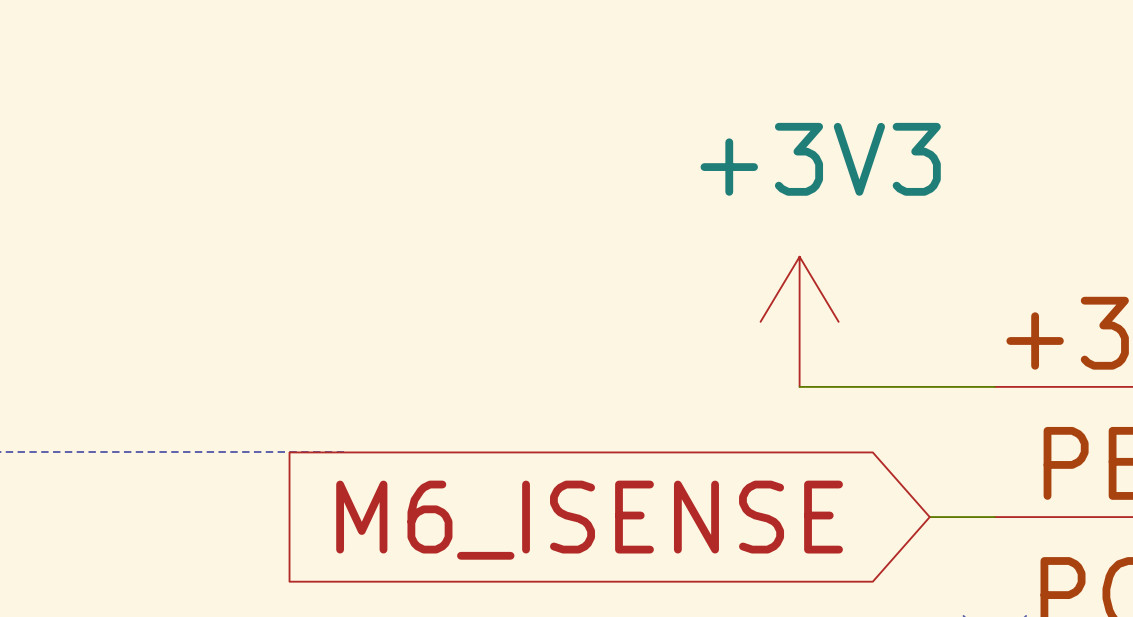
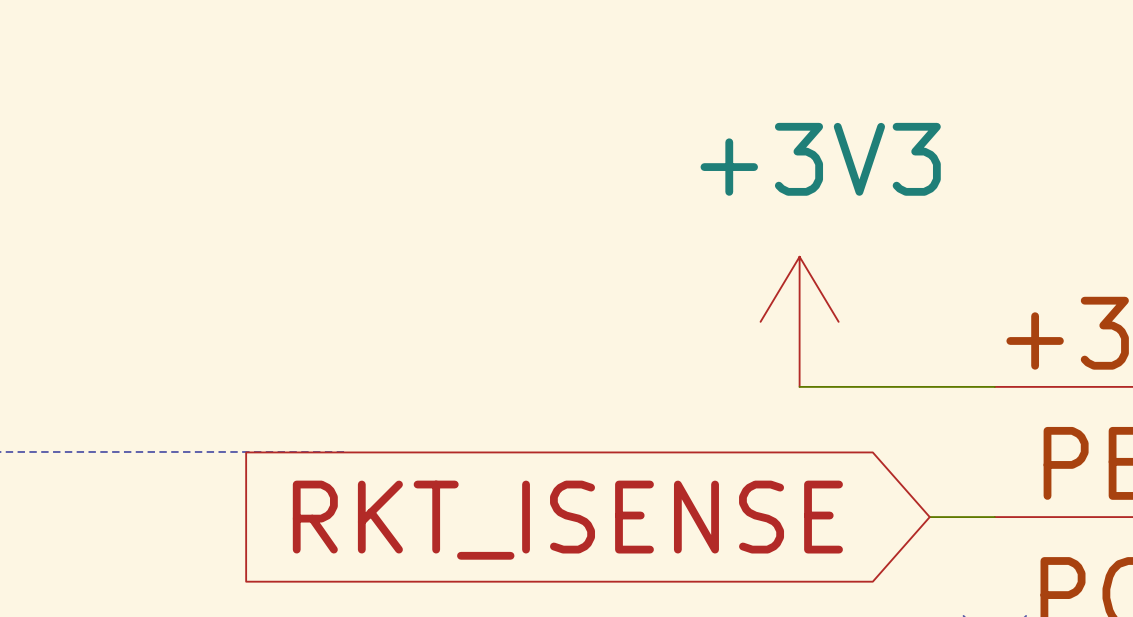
global label: M6_ISENSE (589, 520) -> RKT_ISENSE (567, 520)

